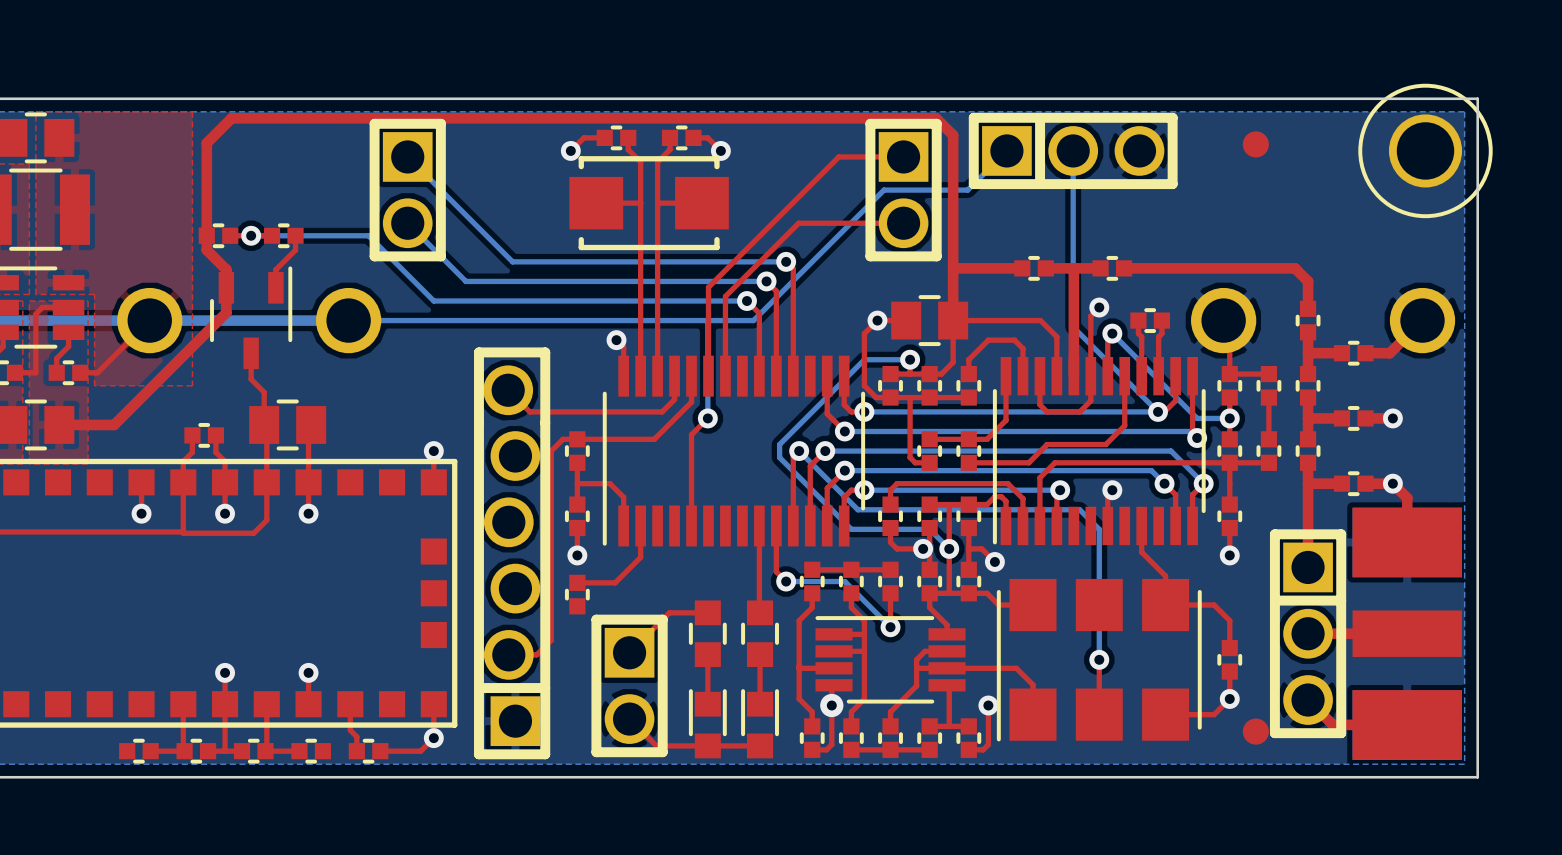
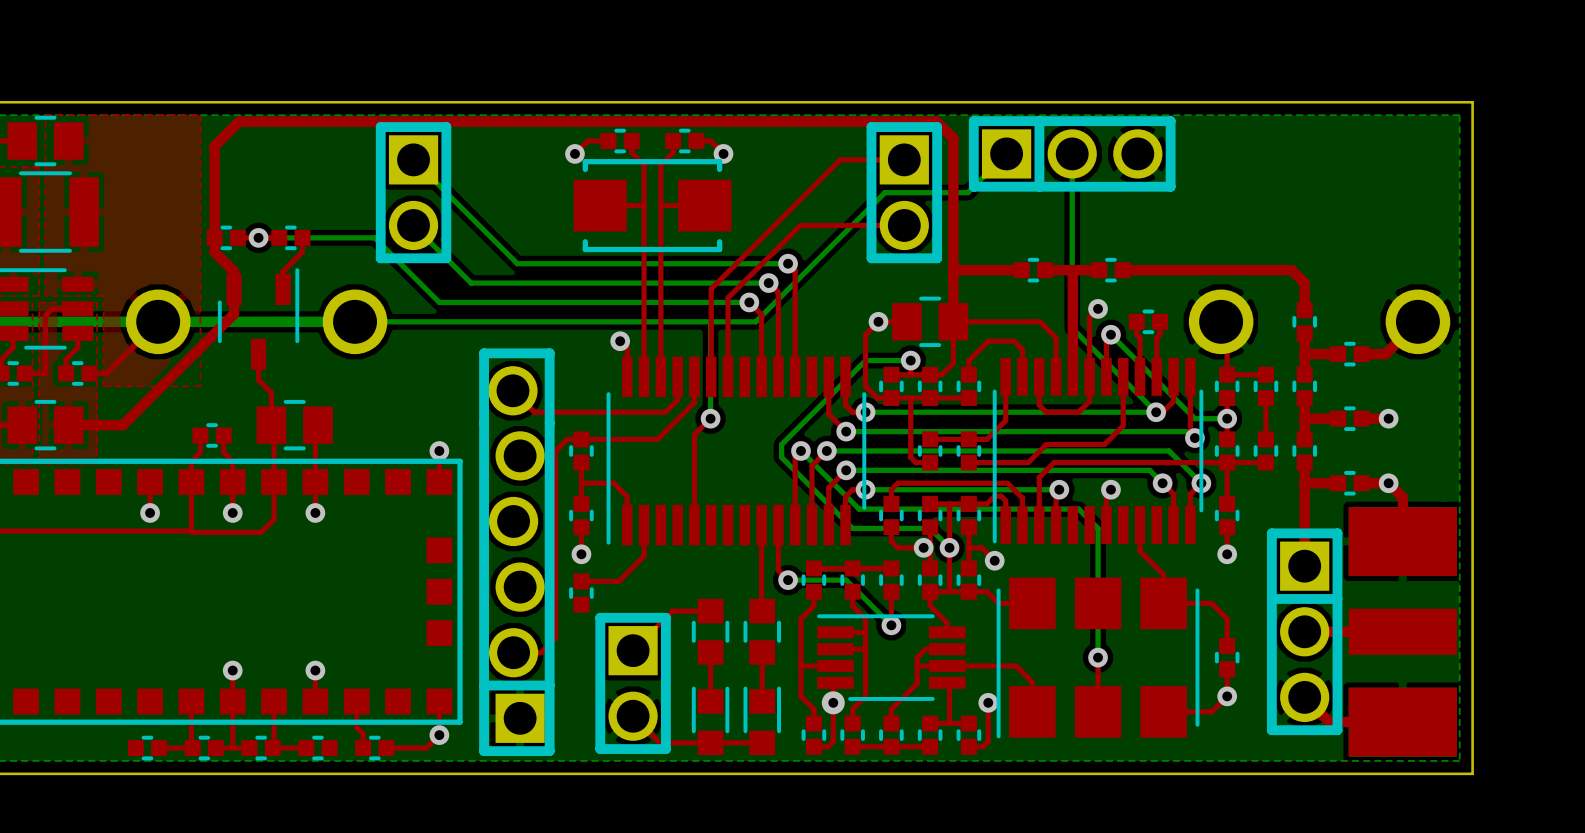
part: (1255, 144) -> none
part: (1425, 150) -> none
part: (1255, 731) -> none

